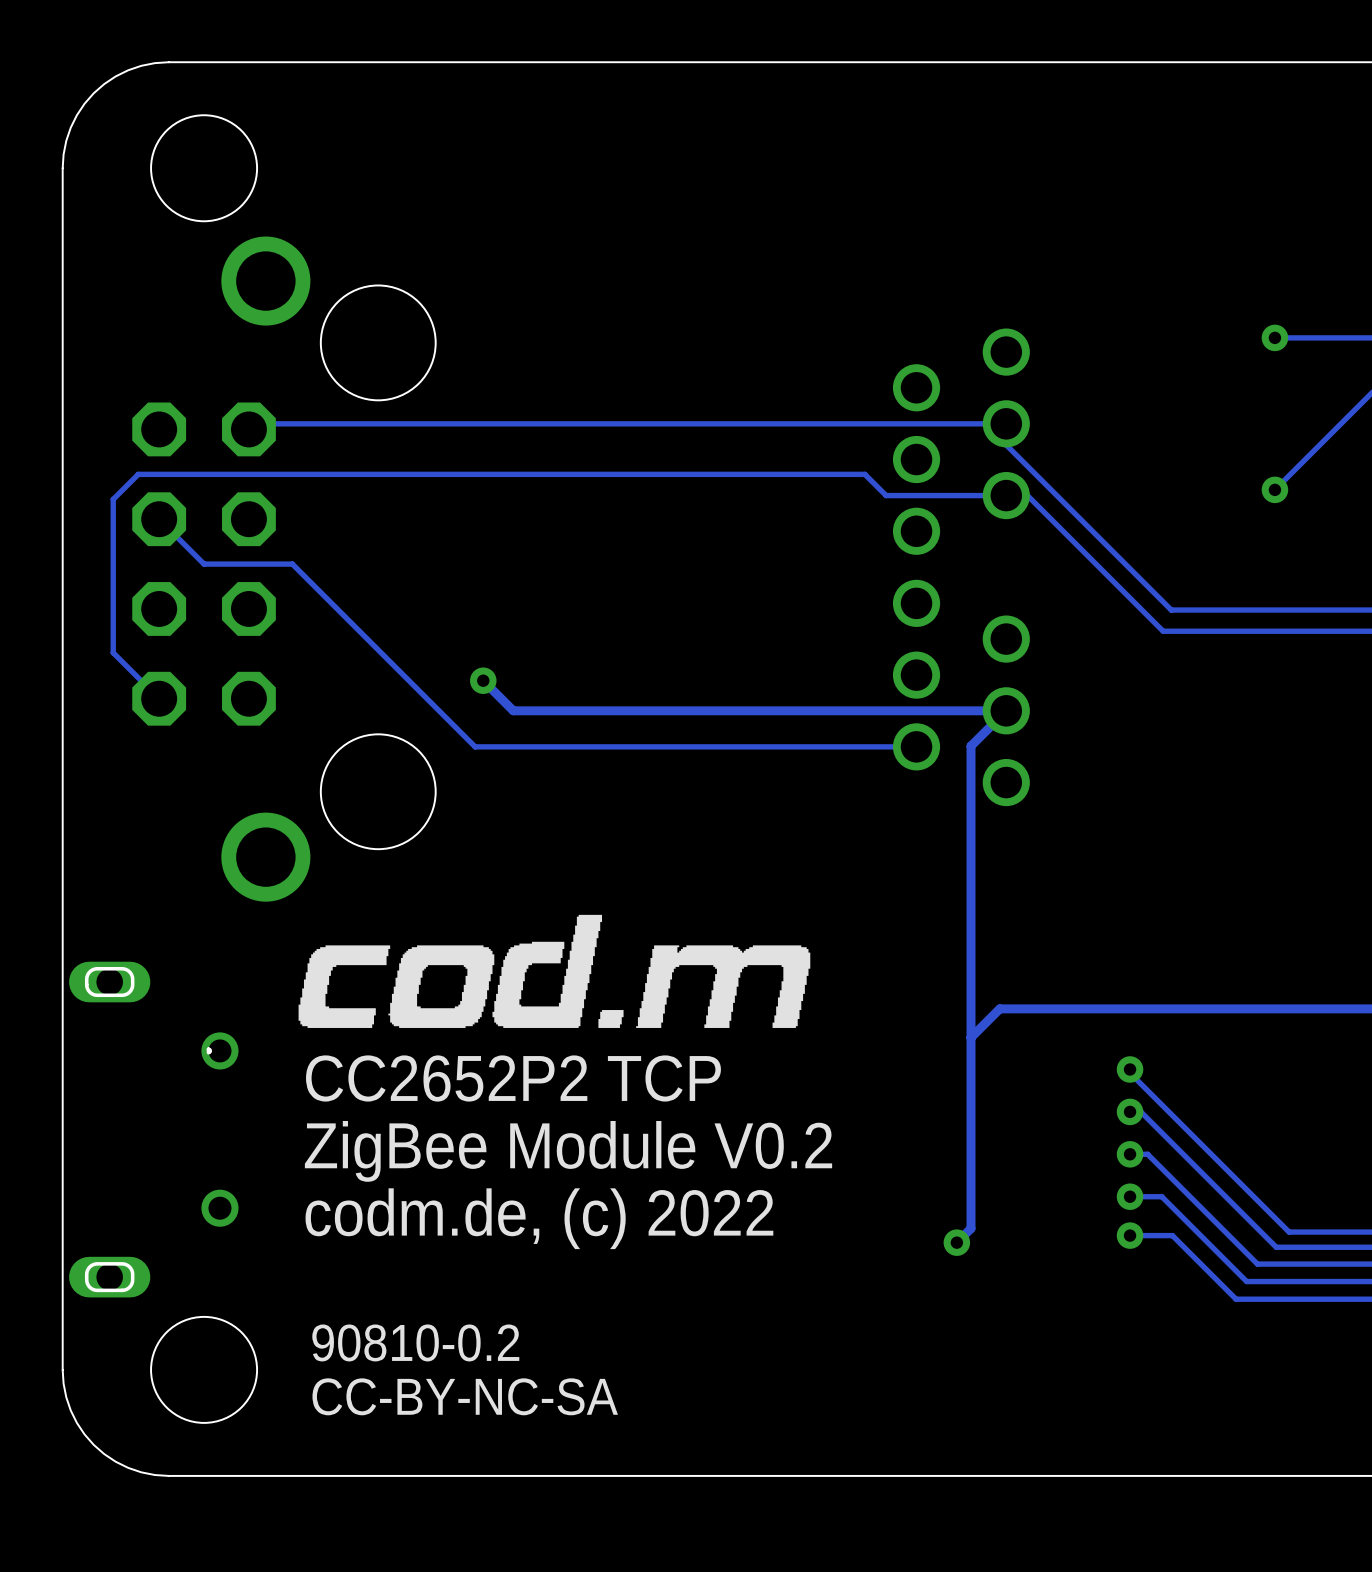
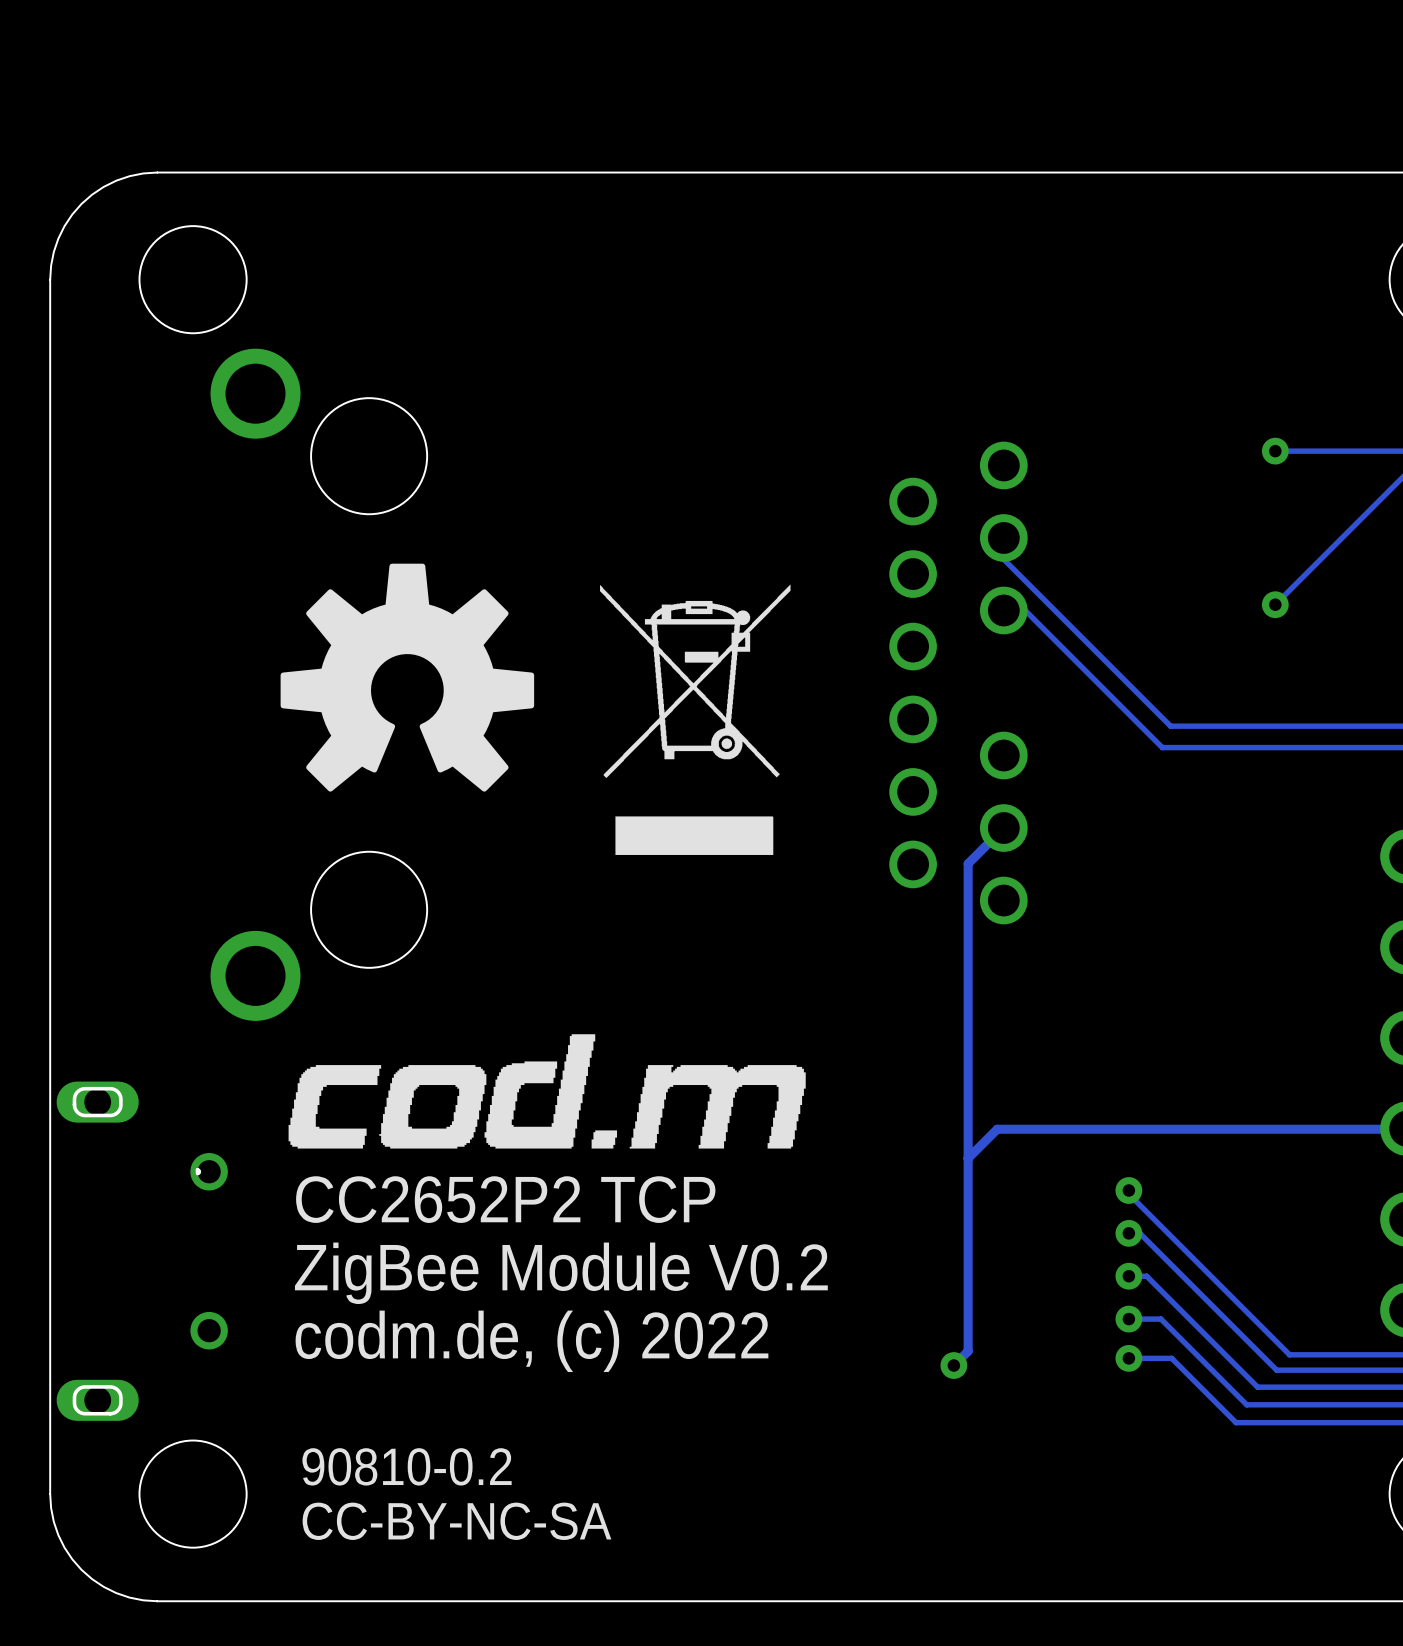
track: (1006, 423) (254, 423) (248, 429) -> none
drawing: none -> [280, 563, 535, 792]
drawing: none -> [600, 584, 791, 855]
track: (1006, 495) (886, 495) (864, 474) (138, 474) (113, 499) (113, 652) (159, 698) -> none
track: (159, 519) (204, 564) (292, 564) (475, 746) (916, 746) -> none
part: (204, 564) -> none
track: (483, 680) (513, 710) (1006, 710) -> none
via: (483, 680) -> none

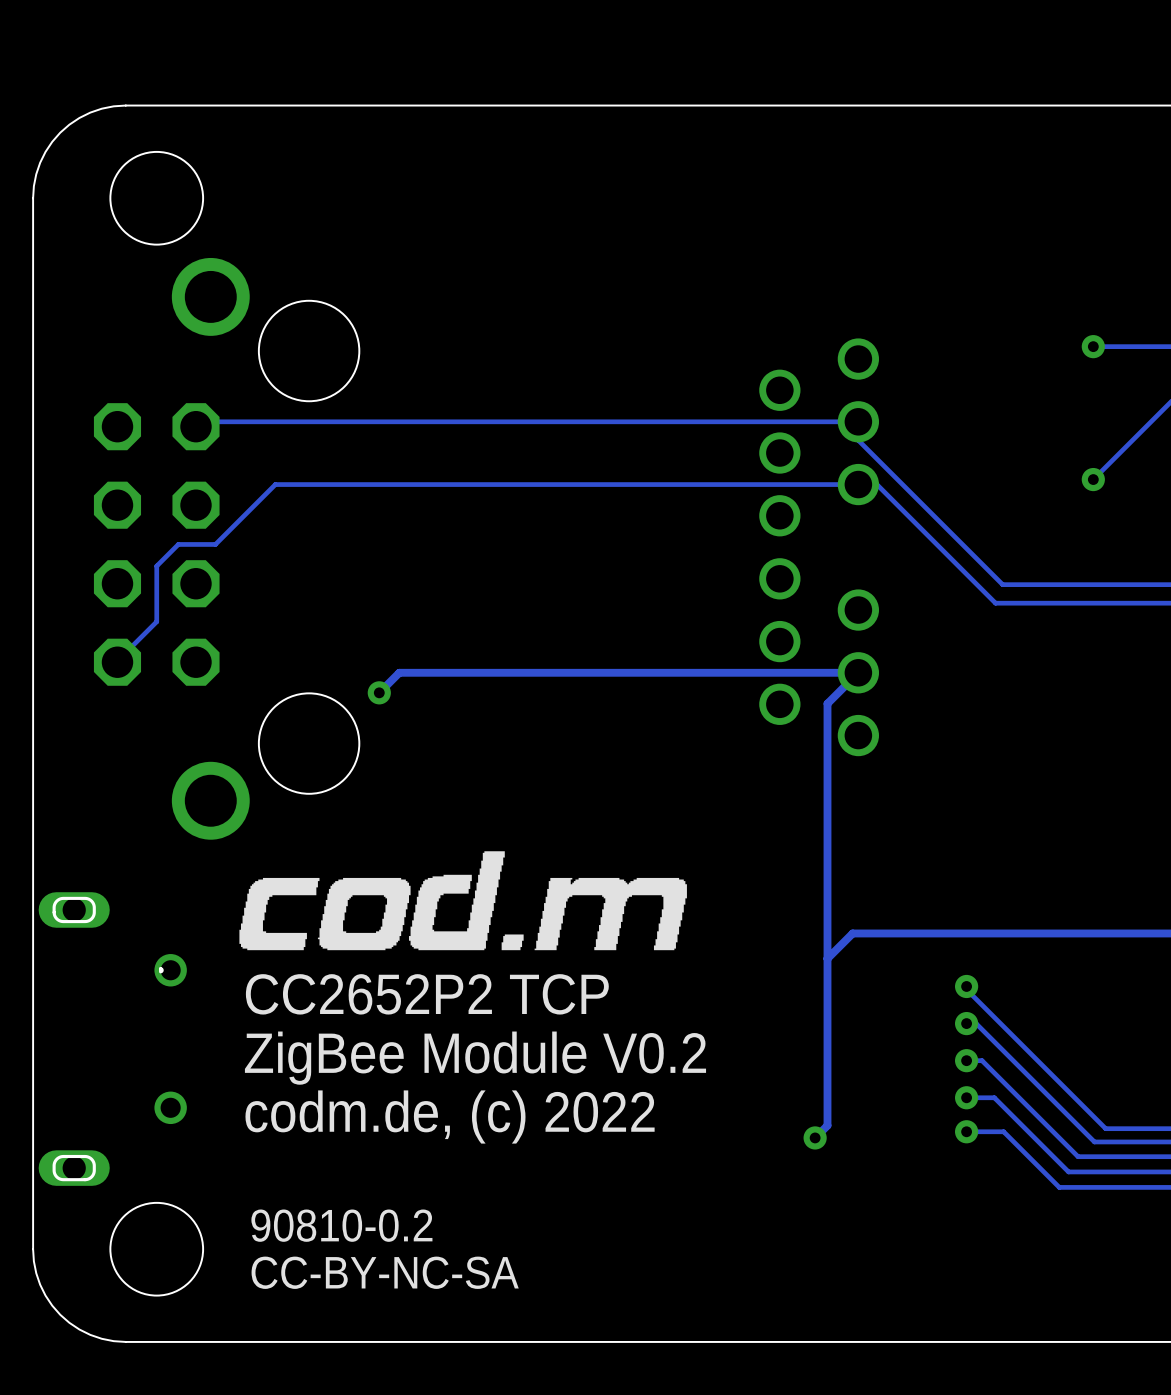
track: none -> (858, 421) (200, 421) (196, 426)
drawing: [280, 563, 535, 792] -> none
drawing: [600, 584, 791, 855] -> none
track: none -> (858, 484) (275, 484) (215, 544) (178, 544) (156, 566) (156, 621) (117, 662)
part: none -> (156, 544)
track: none -> (858, 672) (399, 672) (379, 692)
via: none -> (379, 692)

